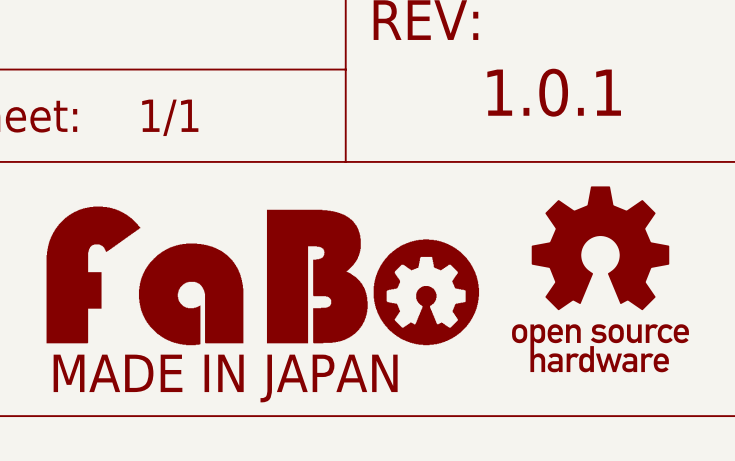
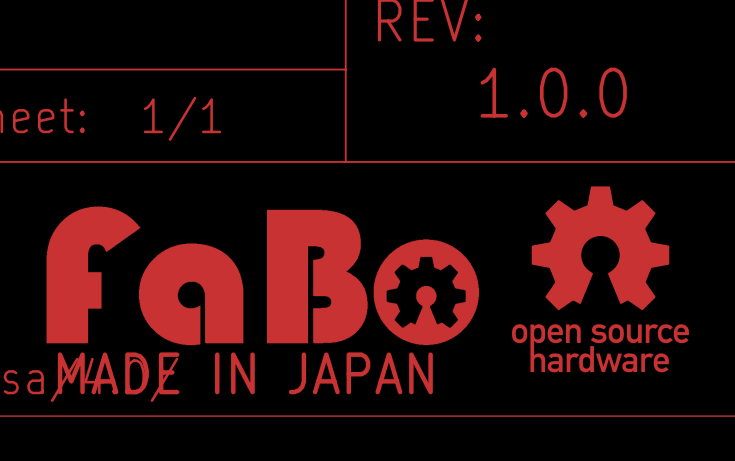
text: 1.0.1 (554, 92) -> 1.0.0 (553, 92)

